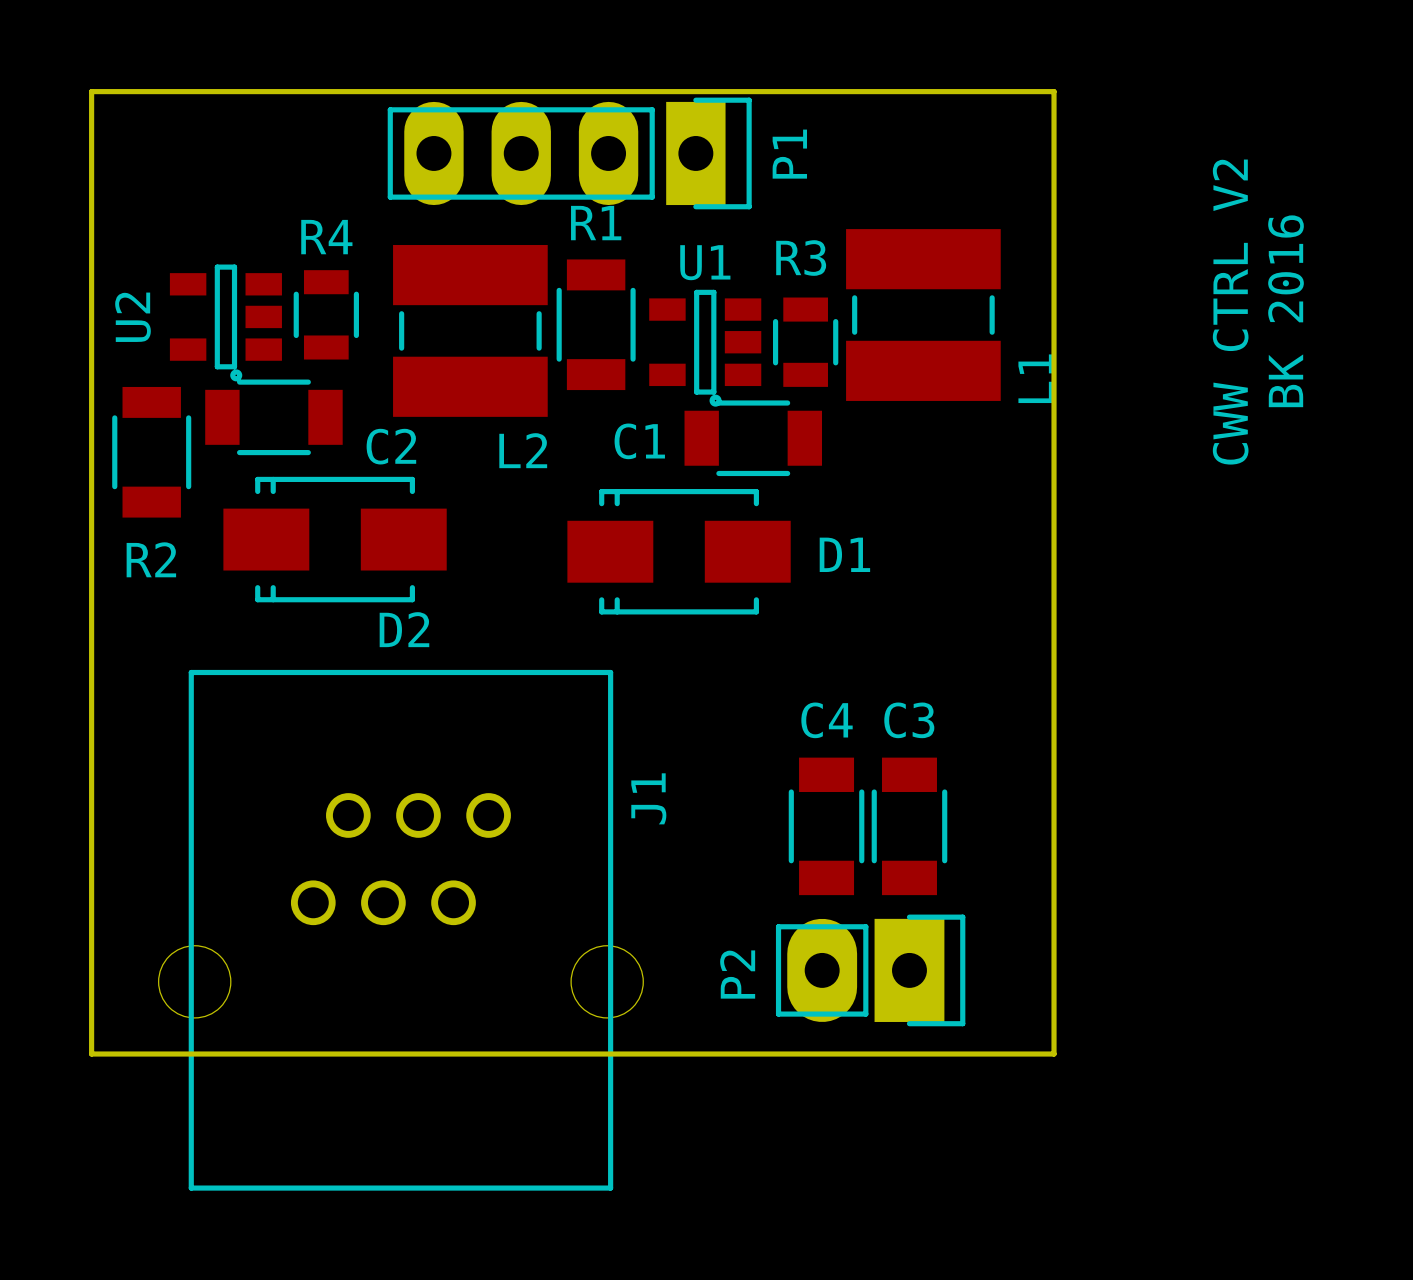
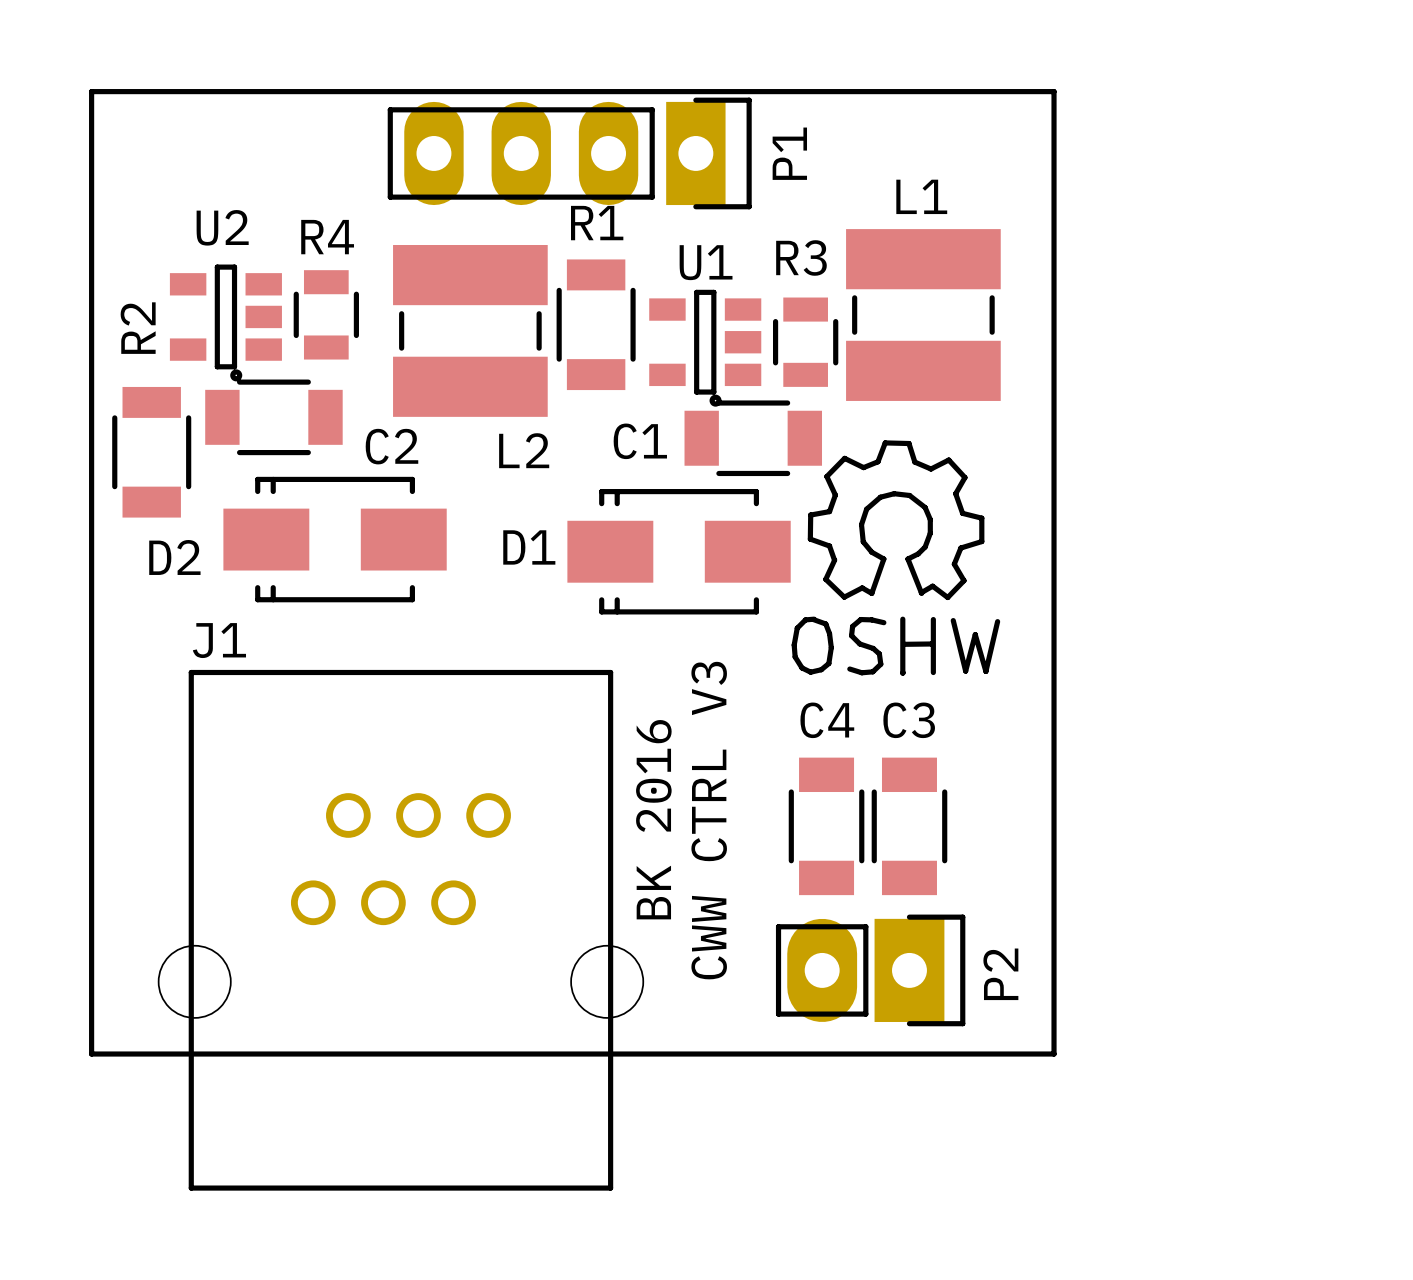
text position: BK 2016 (1286, 311) -> BK 2016 (653, 819)
text: CWW CTRL V2 (1230, 312) -> none
U2 name rotation: 0° (133, 317) -> 90° clockwise (222, 227)
U2 name position: U2 (133, 317) -> U2 (222, 227)
L1 name rotation: 0° (1035, 378) -> 90° clockwise (921, 196)
L1 name position: L1 (1035, 378) -> L1 (921, 196)
drawing: none -> [791, 440, 1001, 676]
D1 name position: D1 (844, 554) -> D1 (529, 547)
R2 name rotation: 0° (151, 559) -> 90° counterclockwise (138, 328)
R2 name position: R2 (151, 559) -> R2 (138, 328)
D2 name position: D2 (404, 629) -> D2 (174, 557)
J1 name rotation: 0° (648, 798) -> 90° clockwise (219, 640)
J1 name position: J1 (648, 798) -> J1 (219, 640)
text: none -> CWW CTRL V3 (709, 820)
P2 name position: P2 (737, 974) -> P2 (1000, 974)

